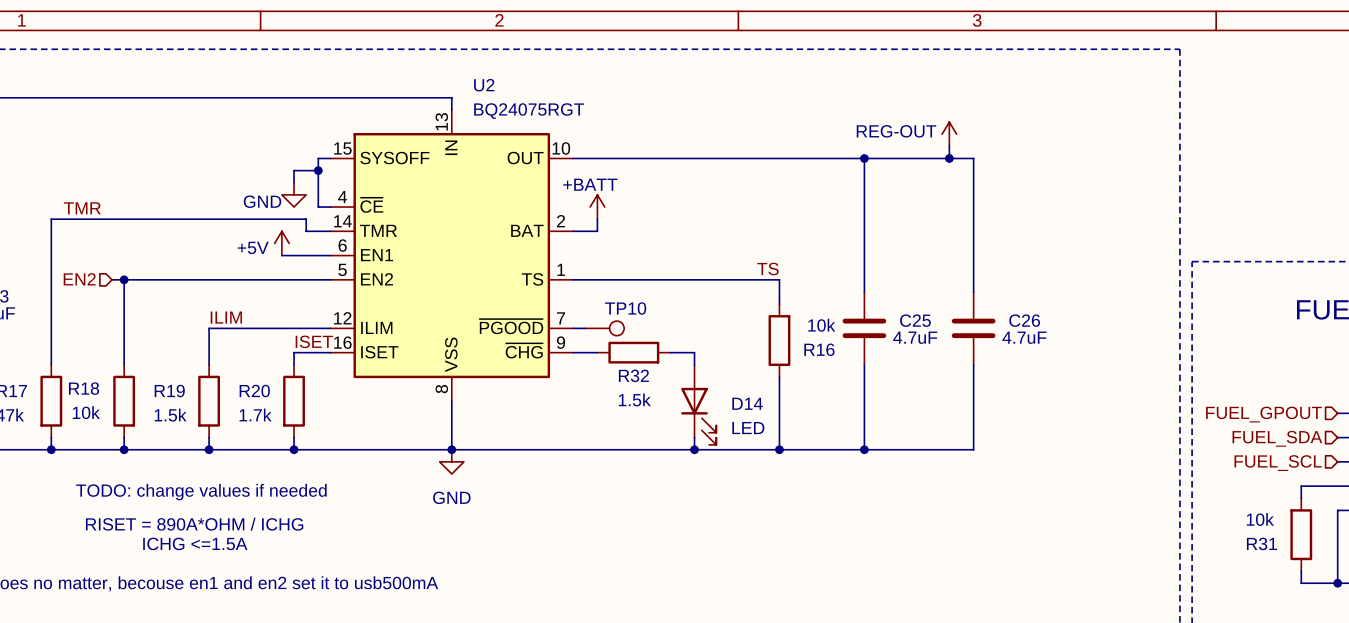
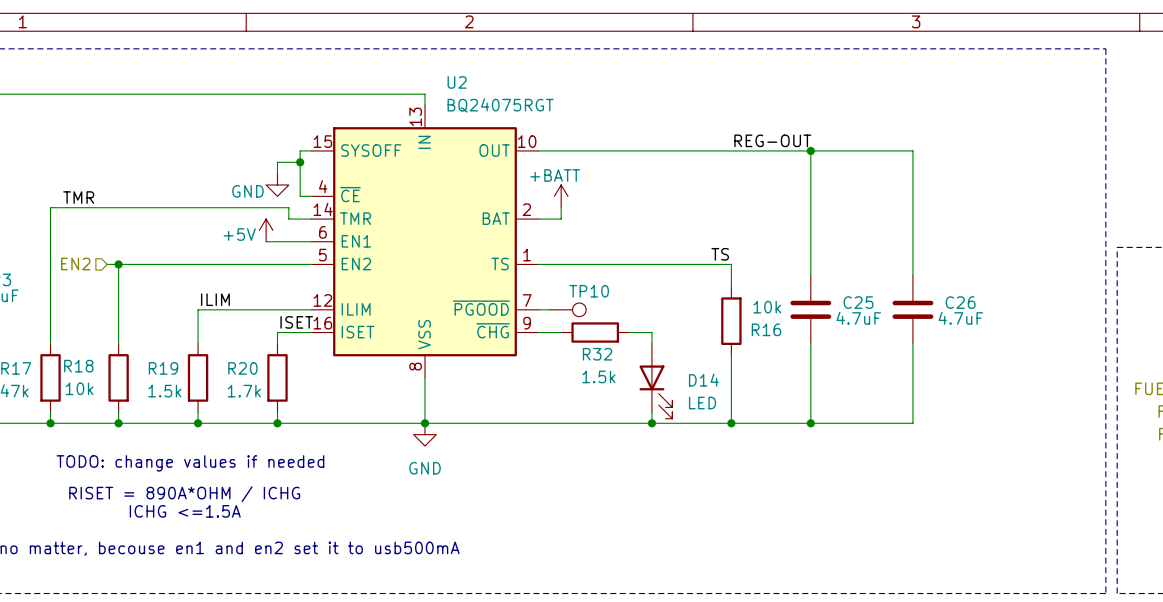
power symbol: REG-OUT (949, 134) -> none
wire: (949, 146) (949, 158) -> none
label: none -> REG-OUT (772, 140)
junction: (949, 158) -> none

